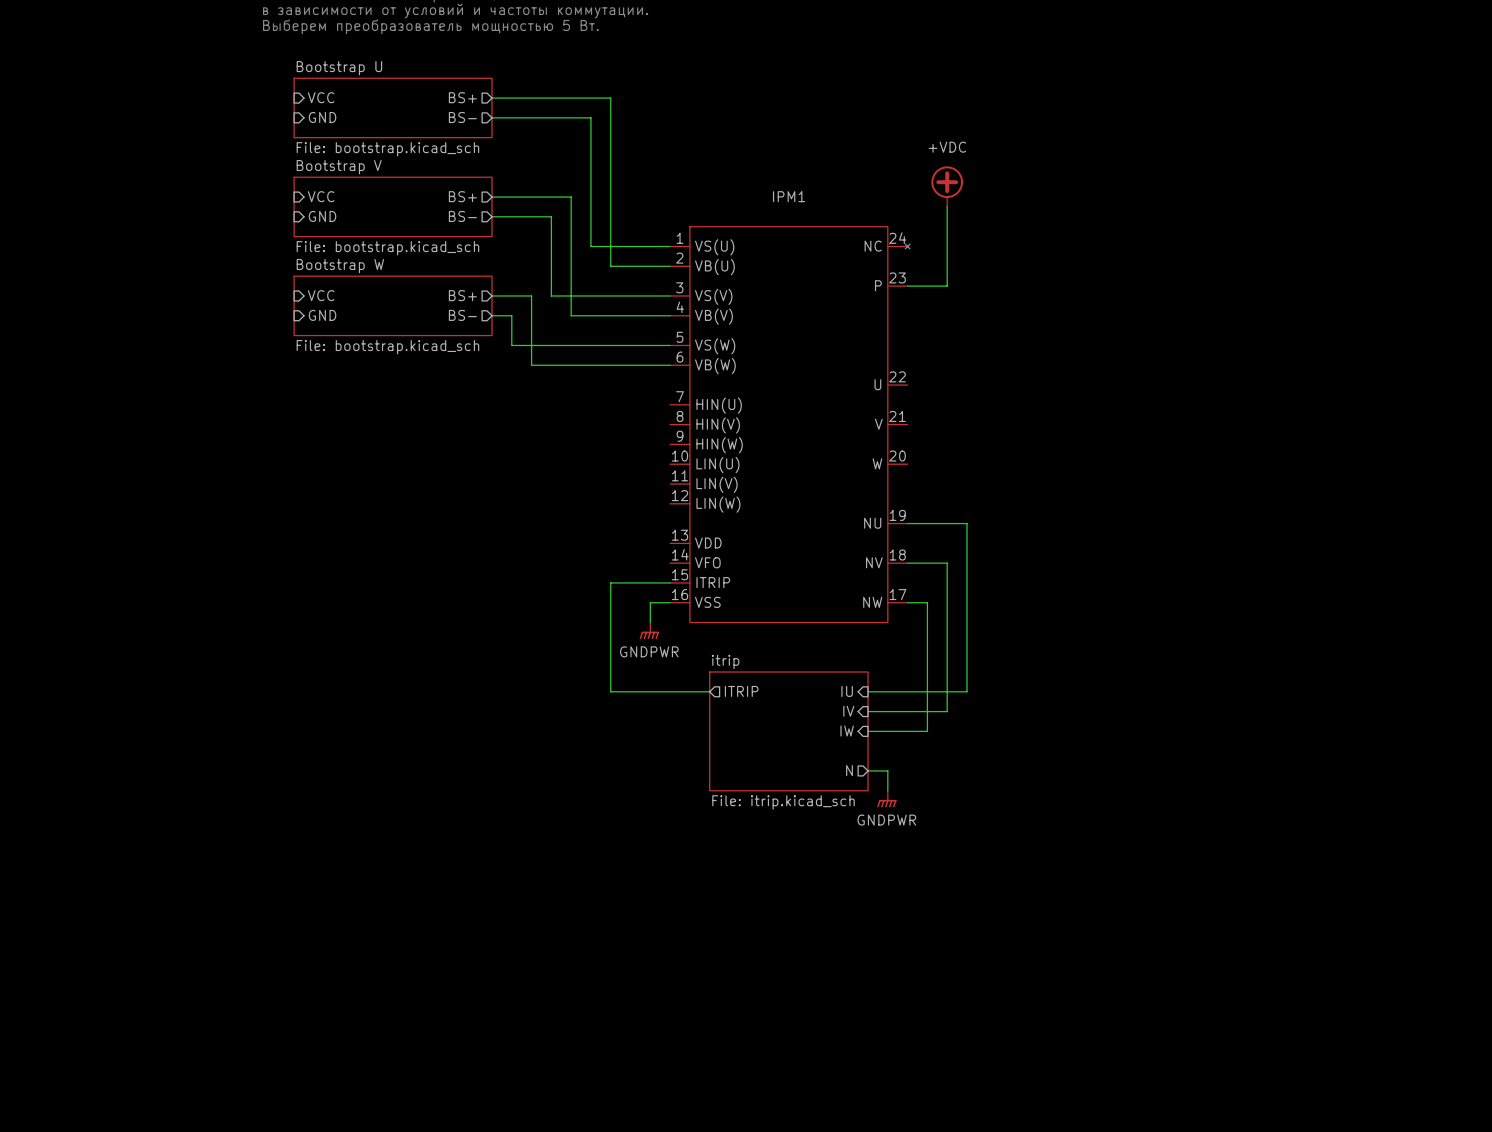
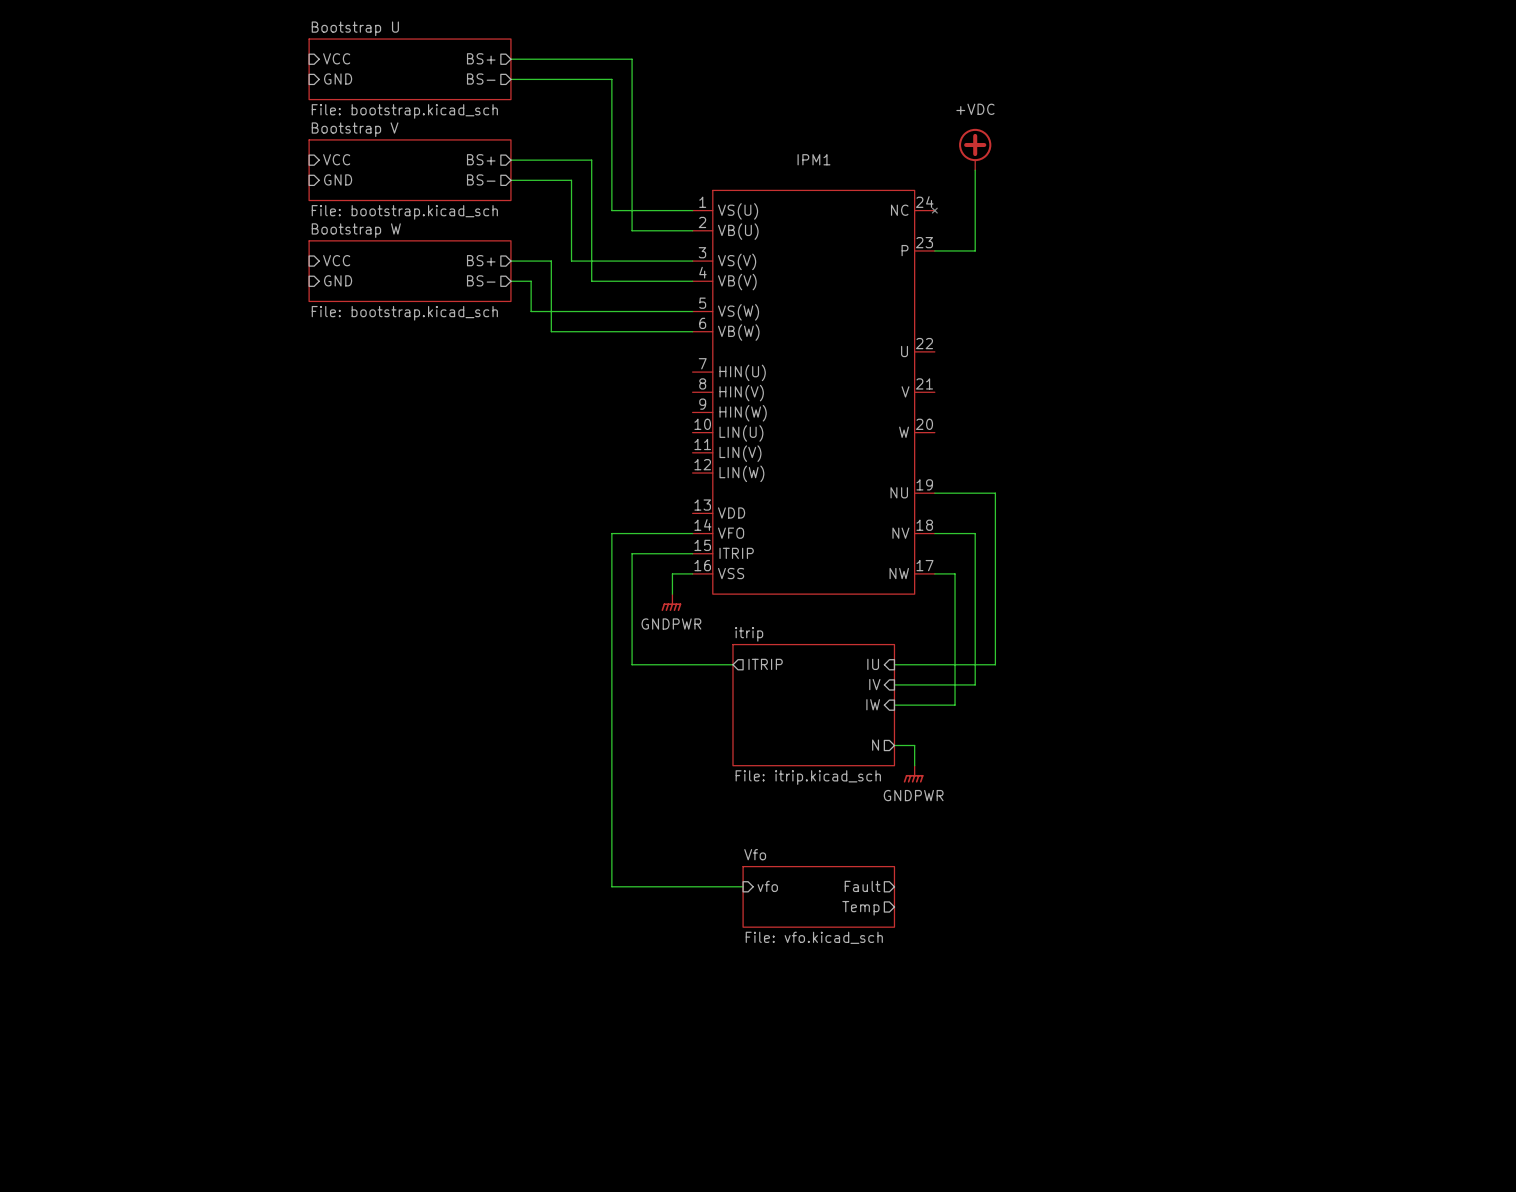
wire: none -> (692, 533) (611, 533) (611, 886) (743, 886)
sheet pin: none -> vfo (767, 886)
sheet pin: none -> Fault (862, 886)
sheet Vfo: none -> File: vfo.kicad_sch (818, 896)
sheet pin: none -> Temp (860, 908)

